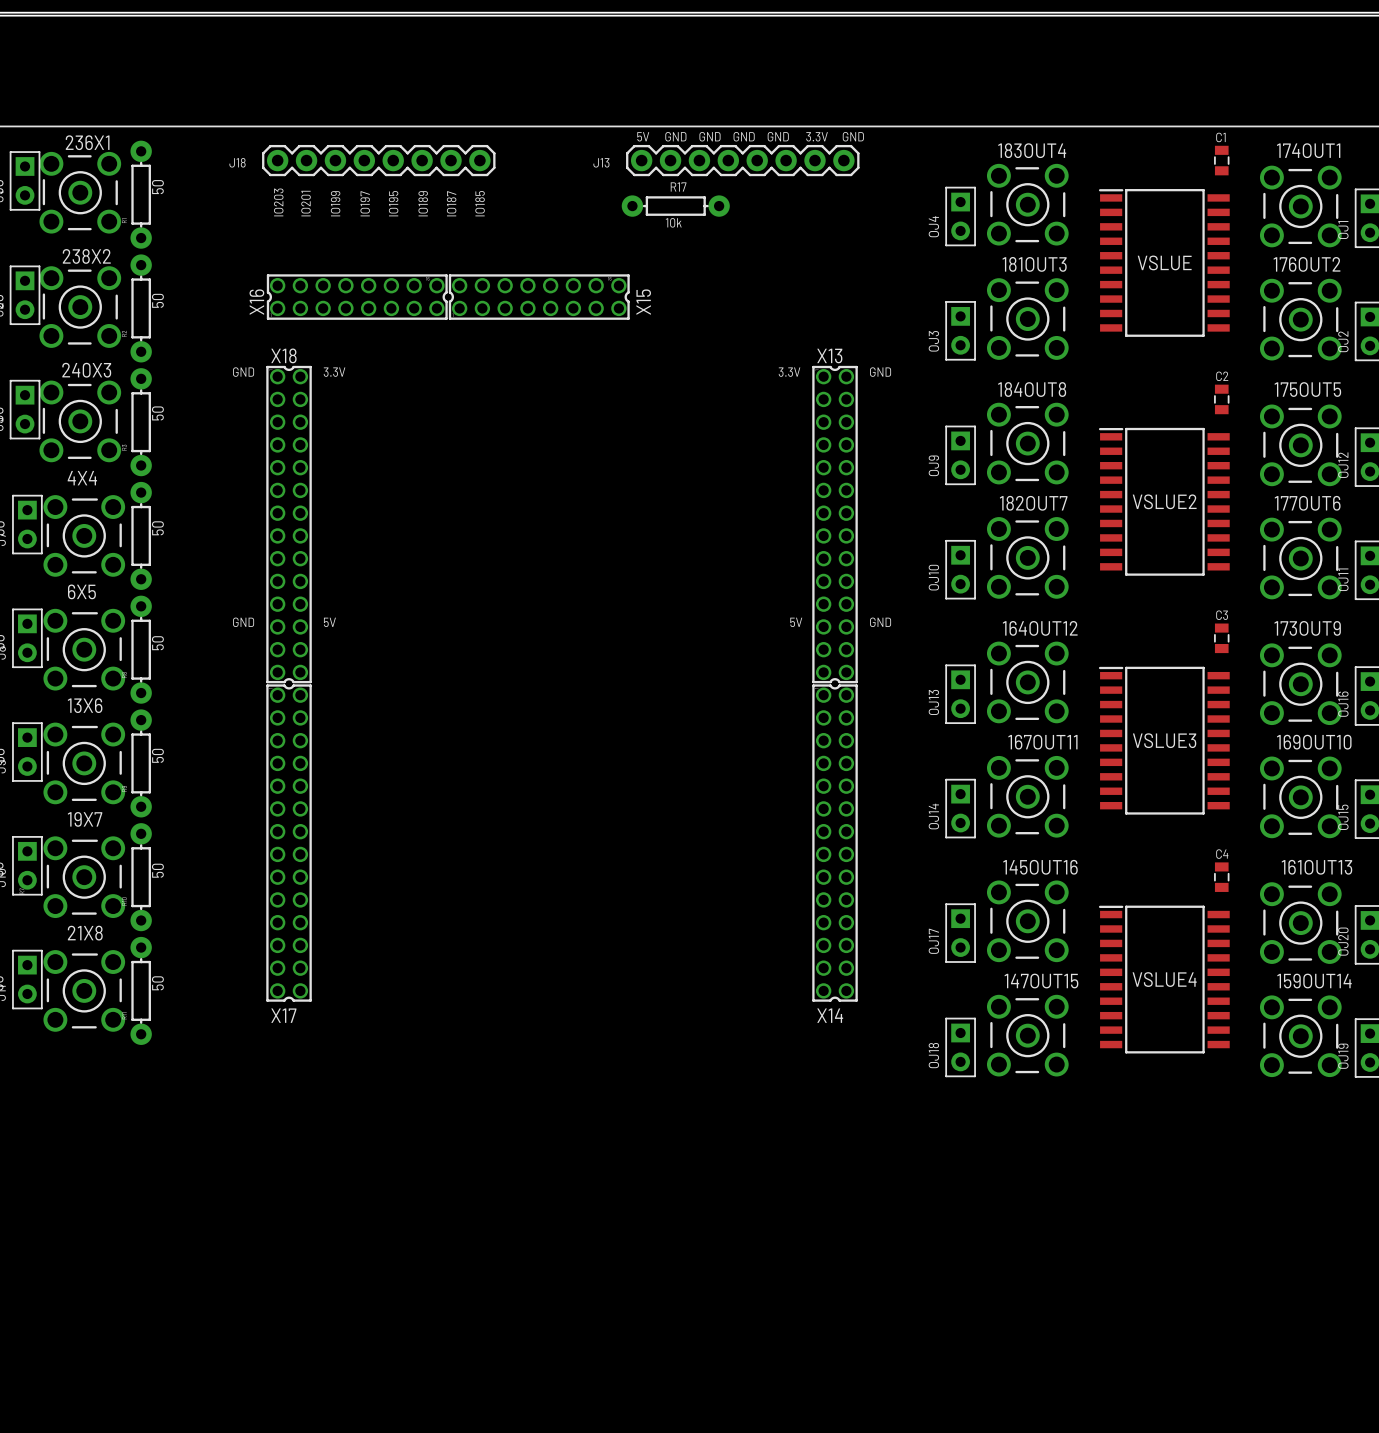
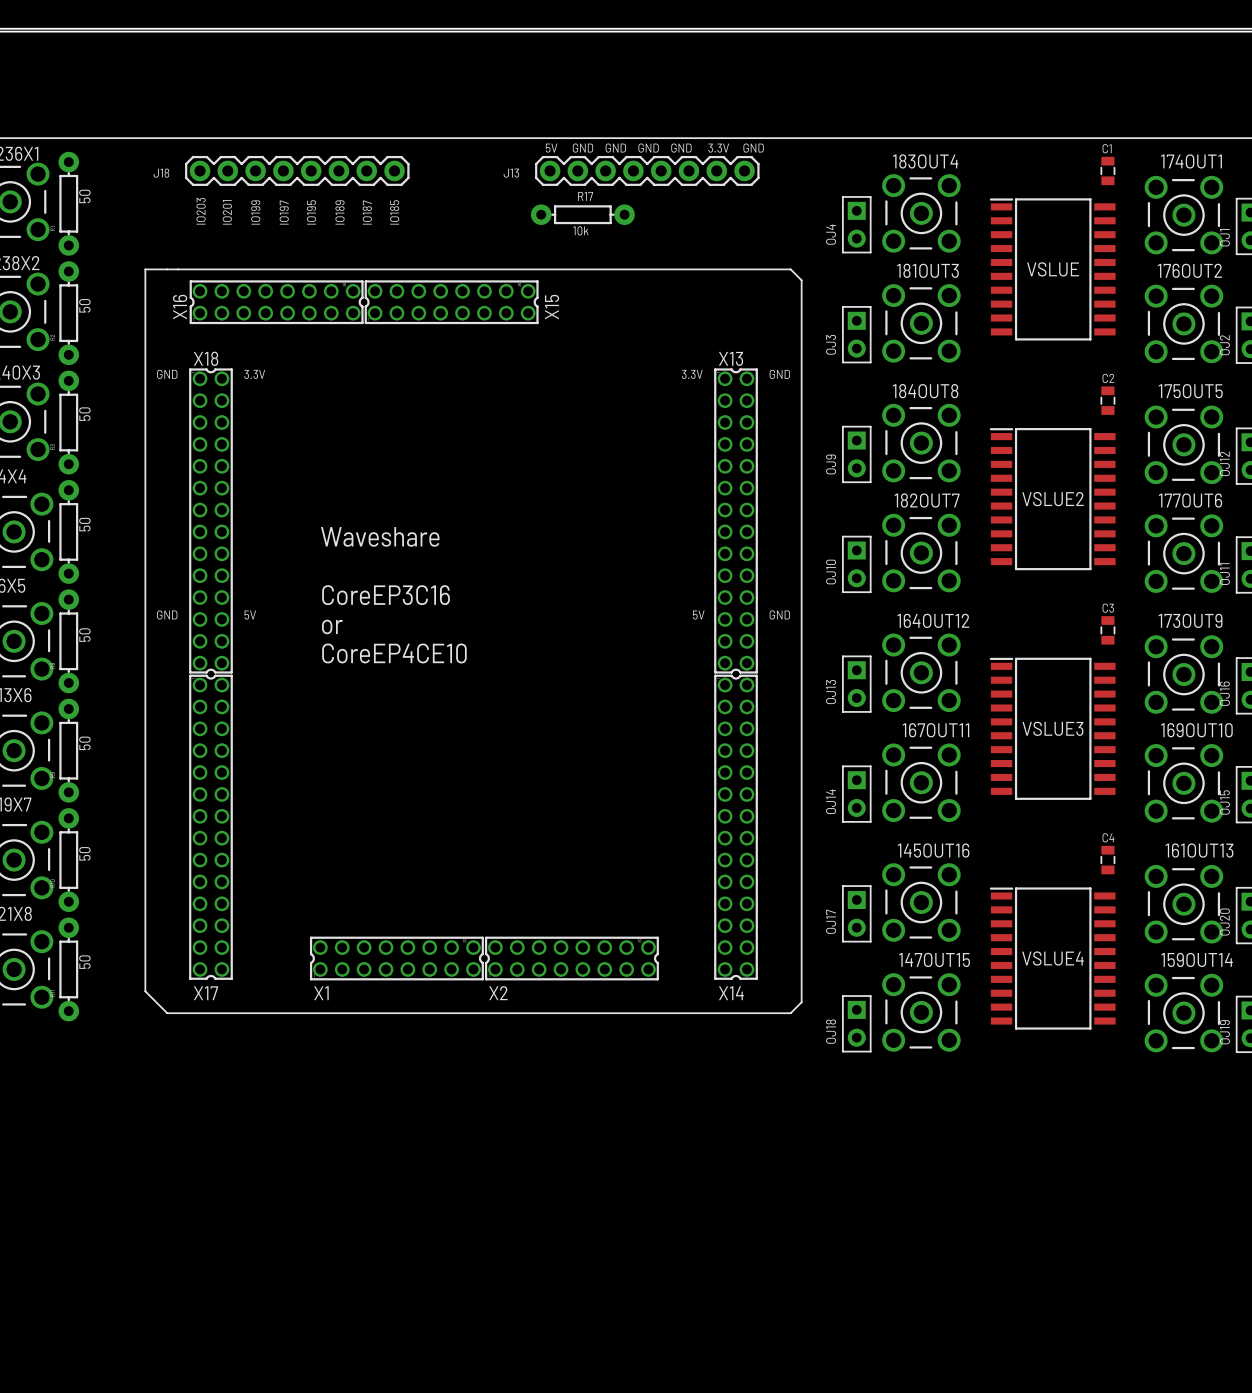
line: none -> (145, 269) (790, 269) (801, 280) (801, 1002) (790, 1013) (167, 1013) (145, 991) (145, 269)
text: none -> Waveshare (380, 536)
text: none -> CoreEP3C16 (386, 595)
text: none -> or (332, 626)
text: none -> CoreEP4CE10 (394, 653)
X1: none -> (396, 958)
X2: none -> (571, 958)

